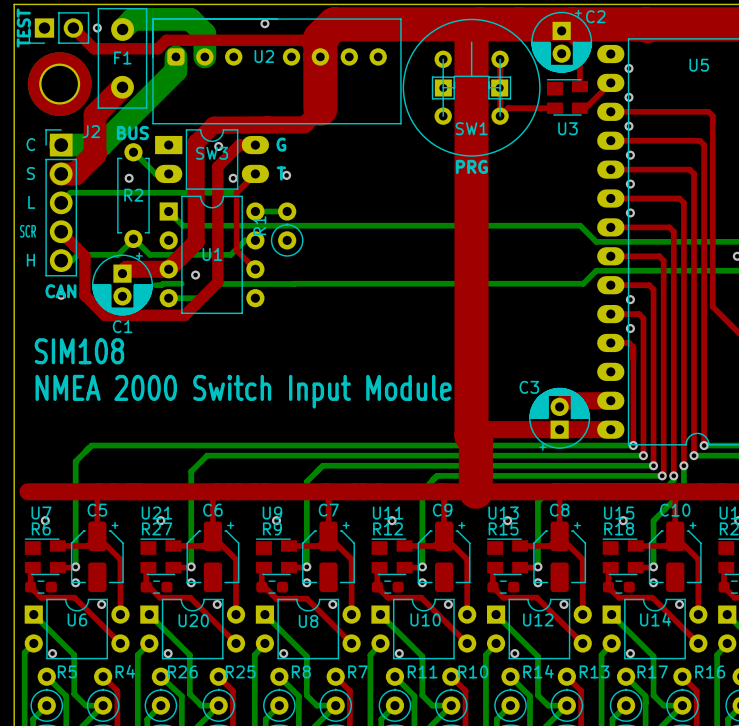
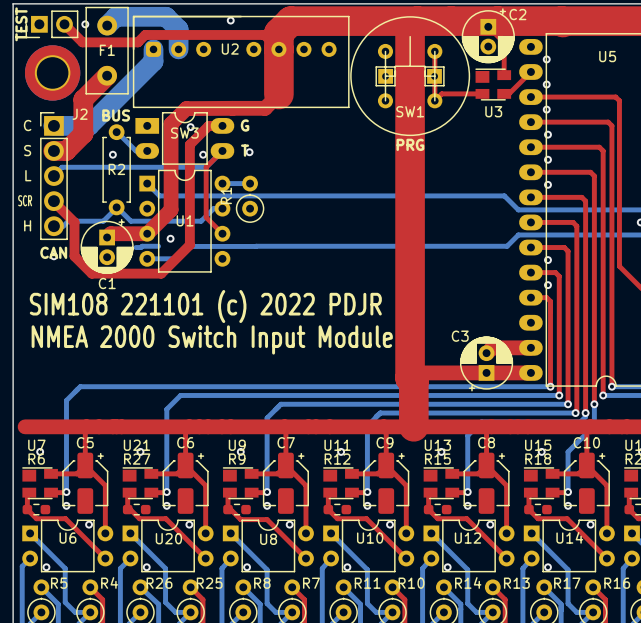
text: SIM108 (79, 351) -> SIM108 221101 (c) 2022 PDJR (205, 306)

